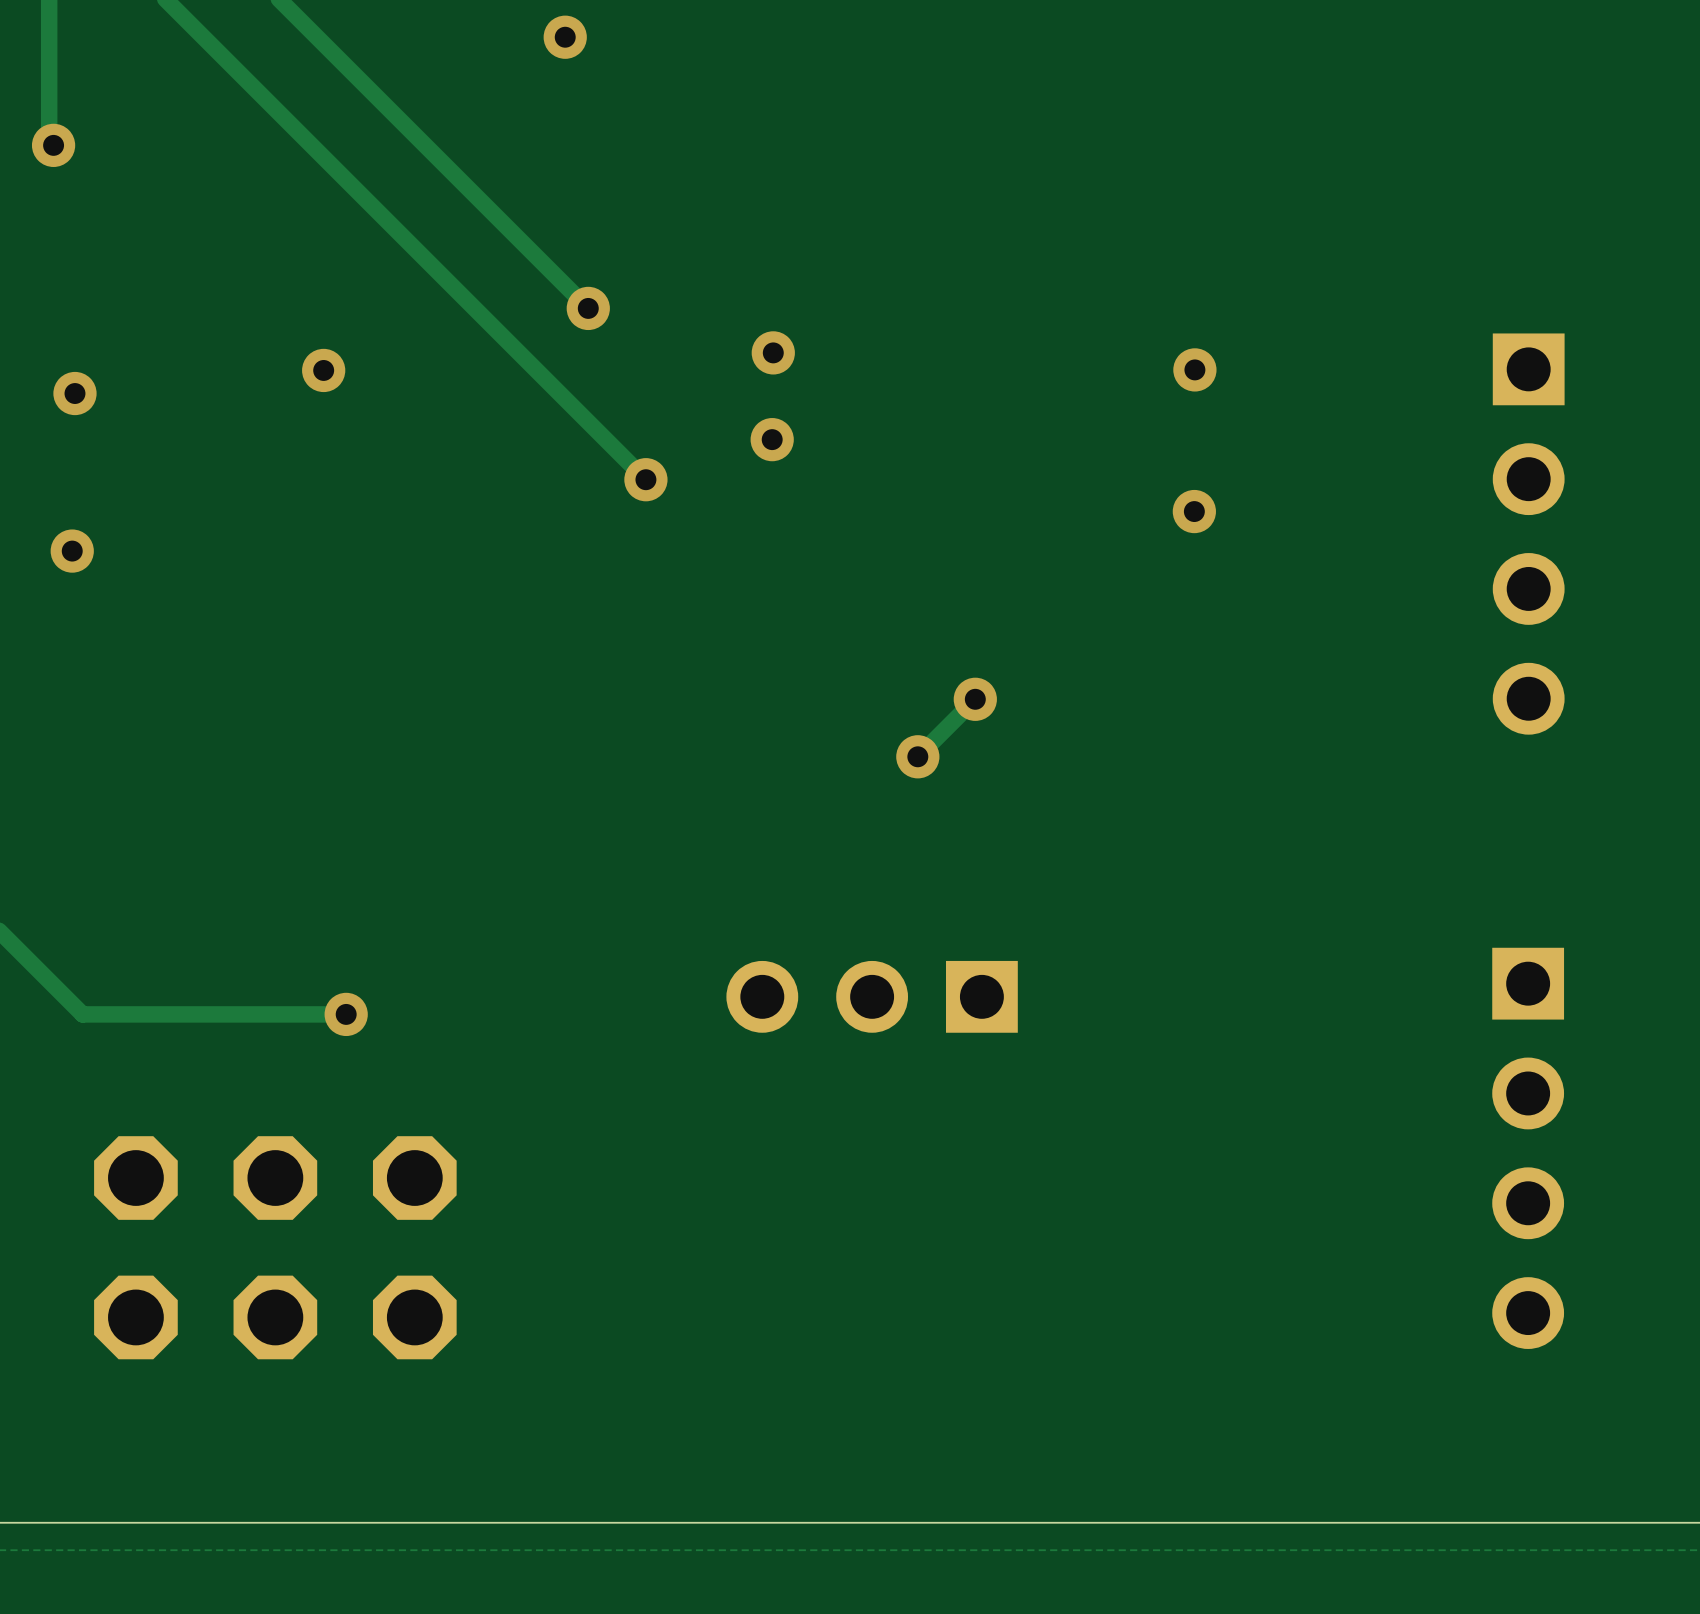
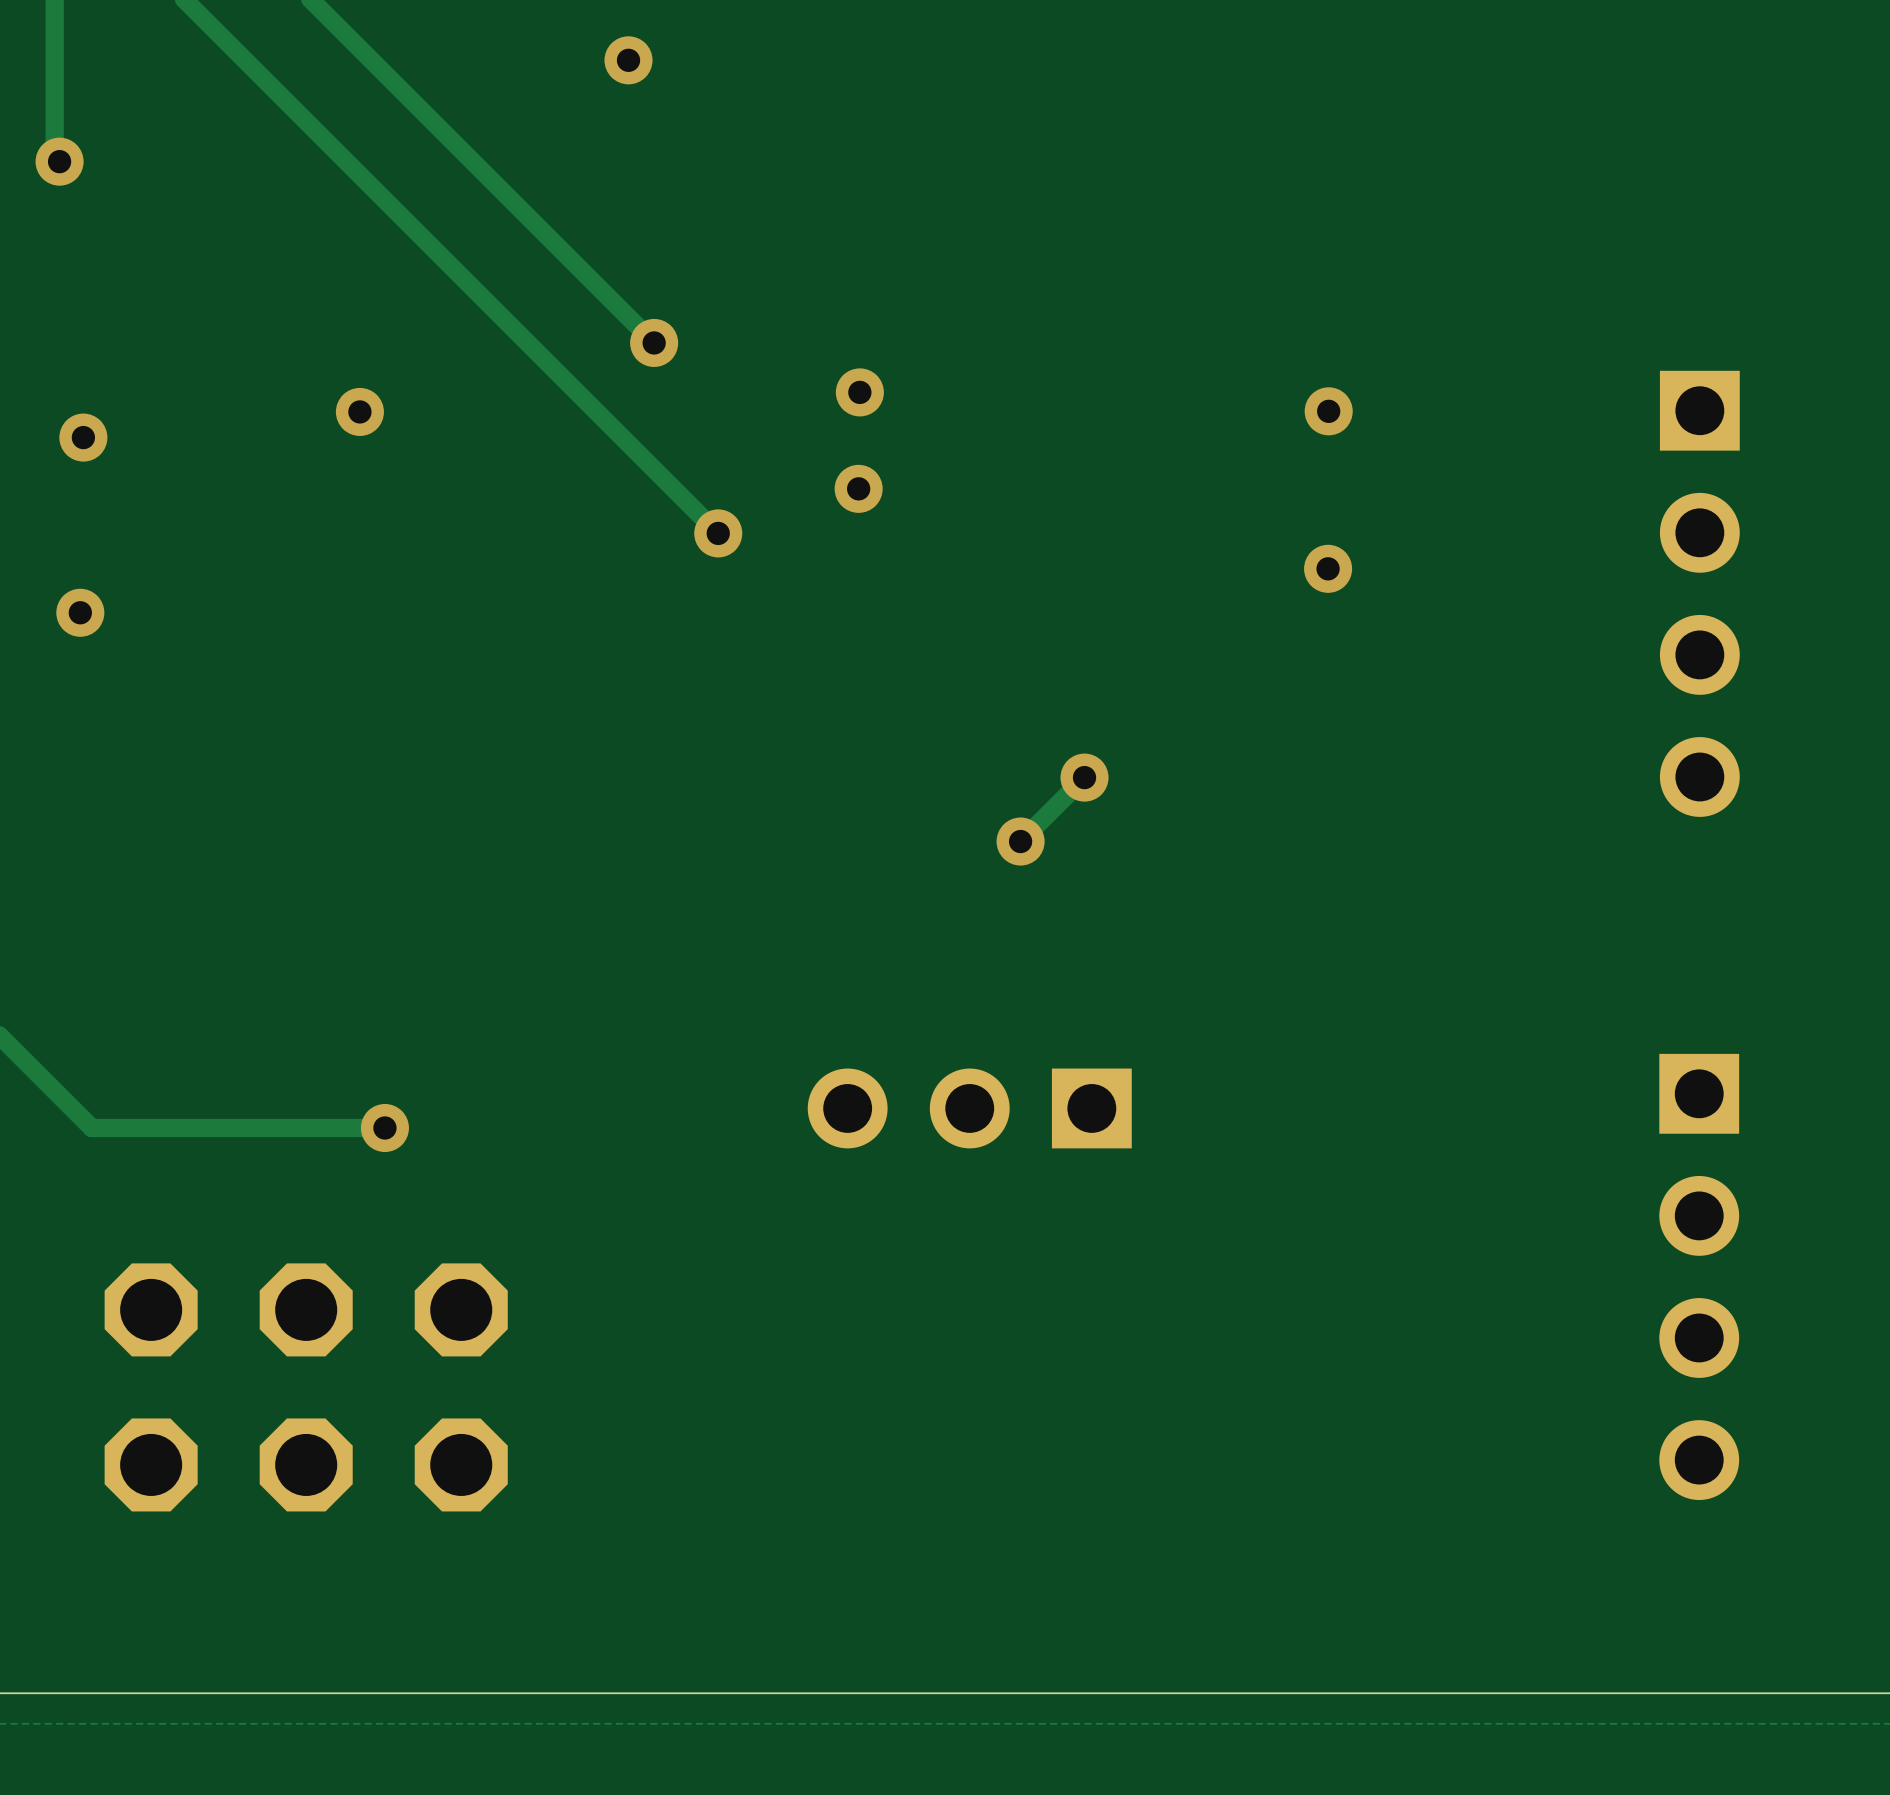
via position: (565, 37) -> (628, 60)

